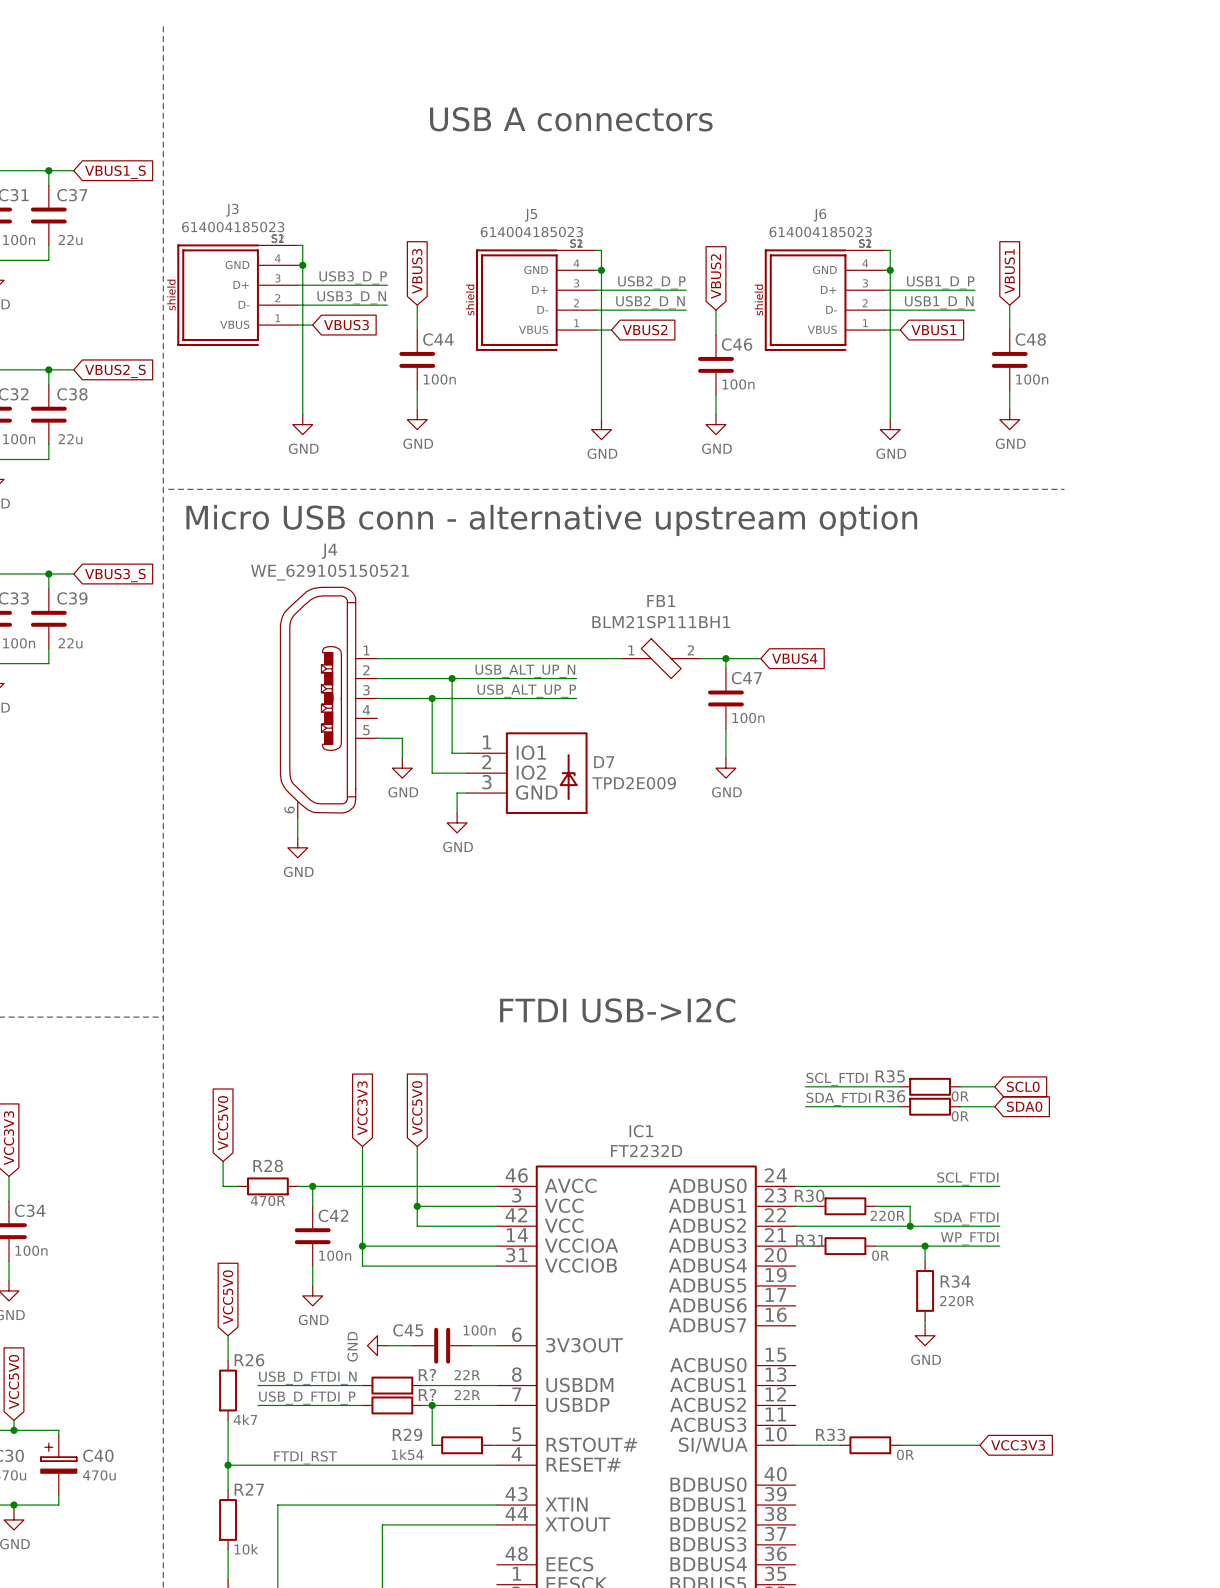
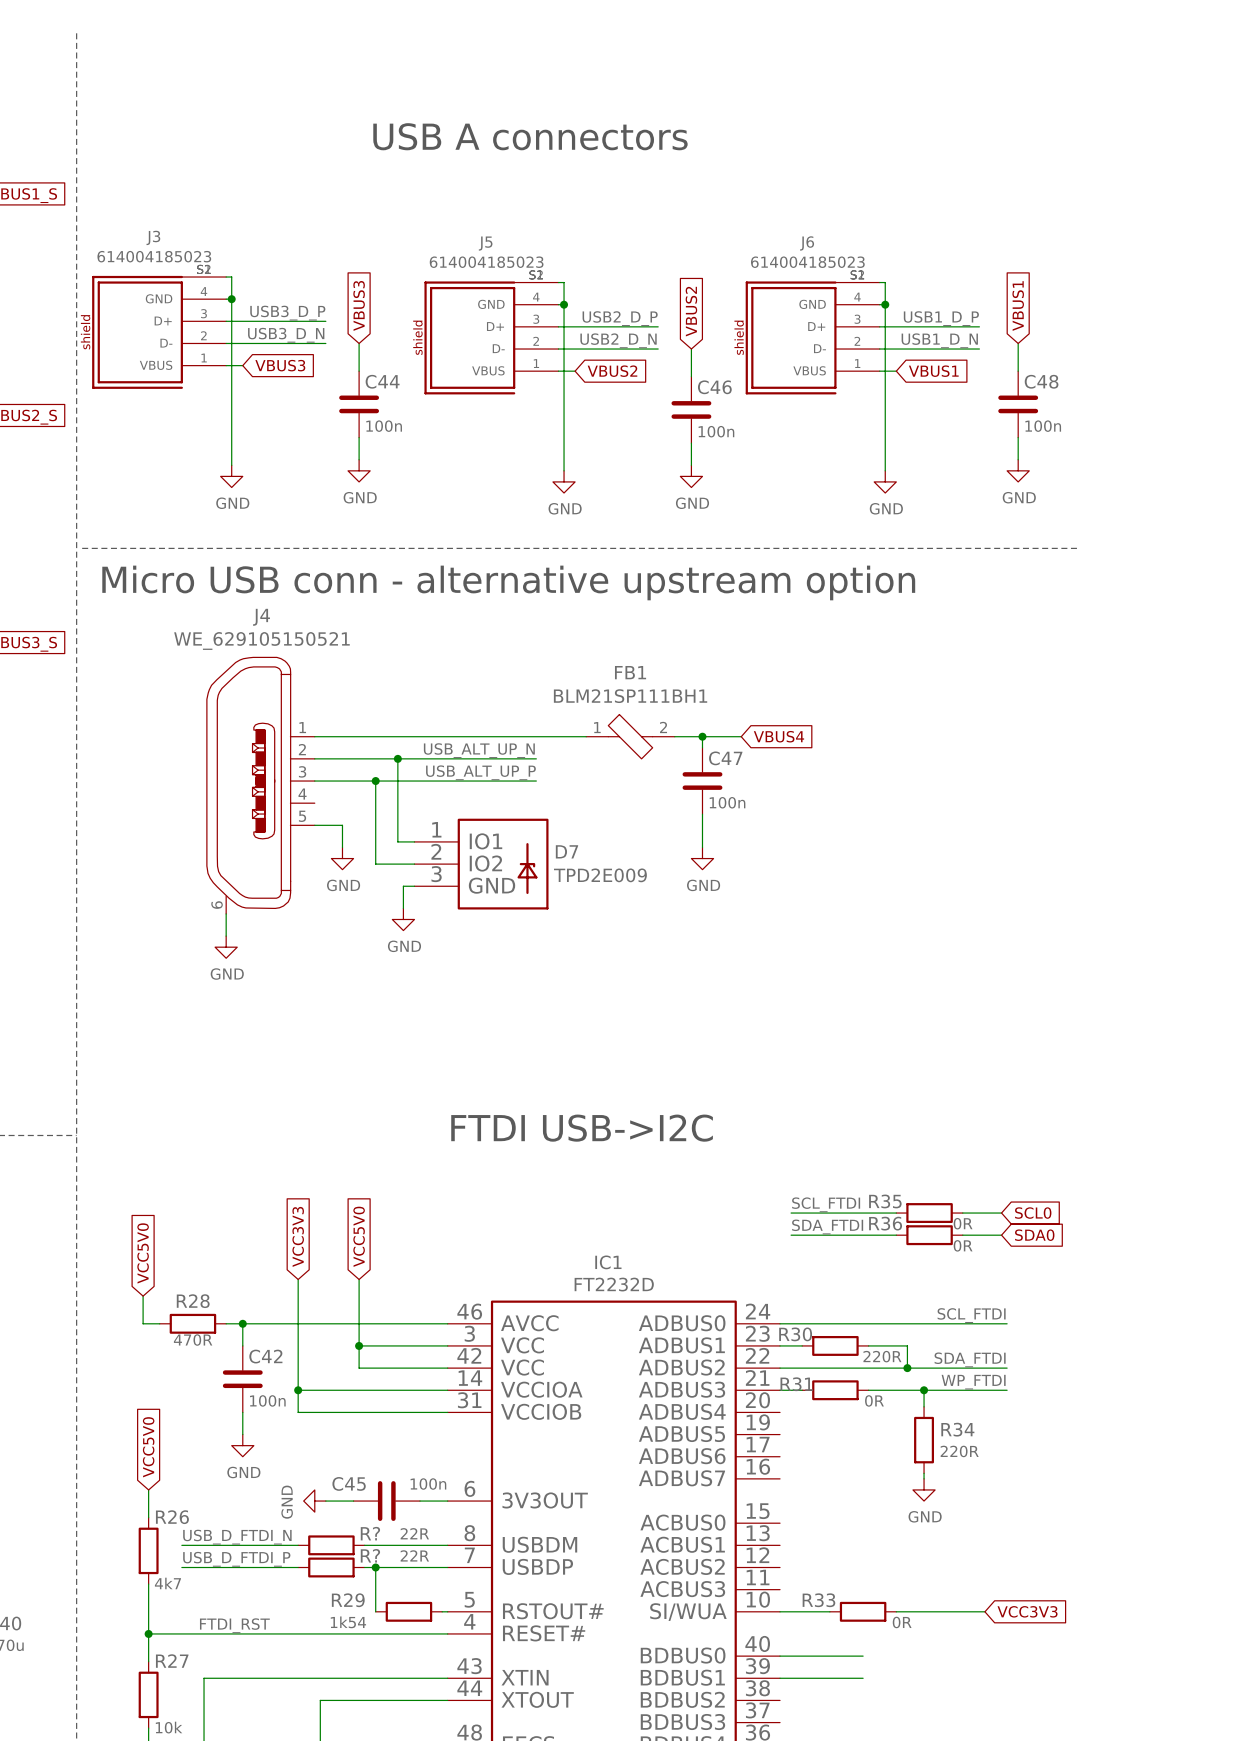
wire: none -> (780, 1656) (863, 1656)
wire: none -> (780, 1678) (863, 1678)

